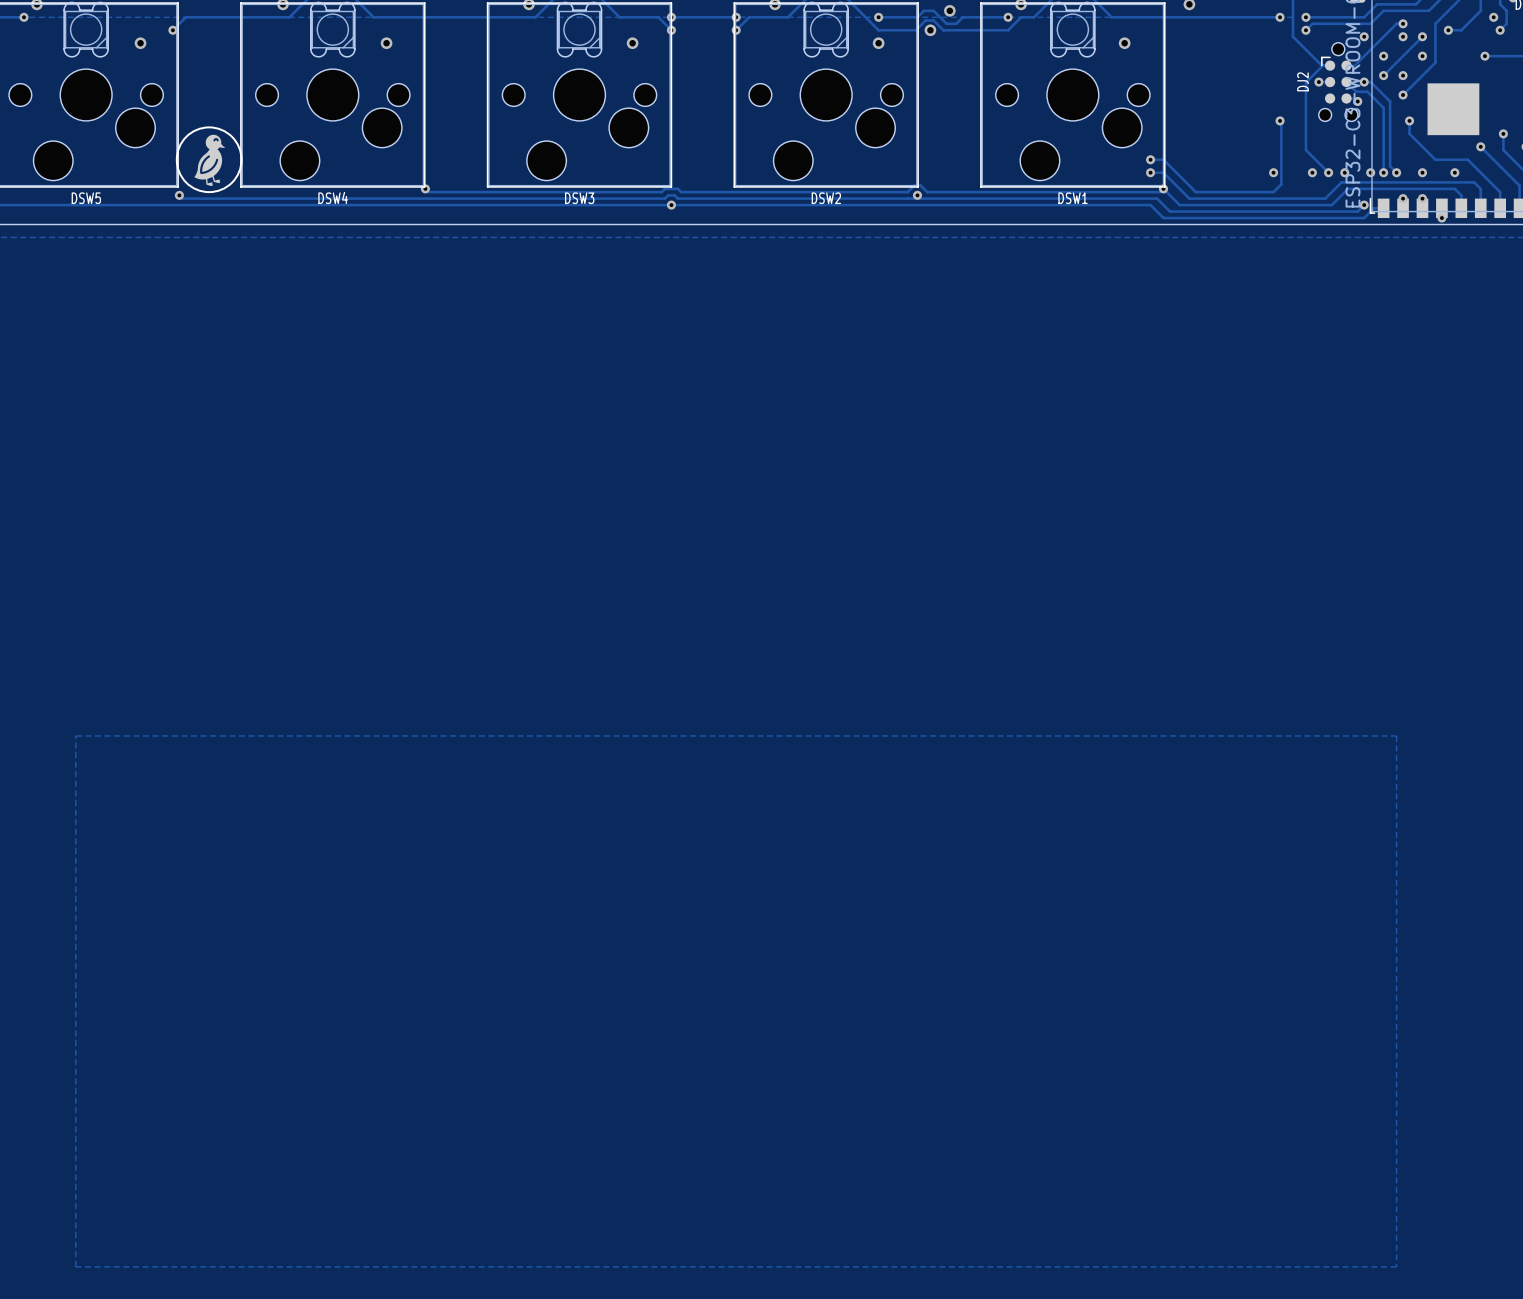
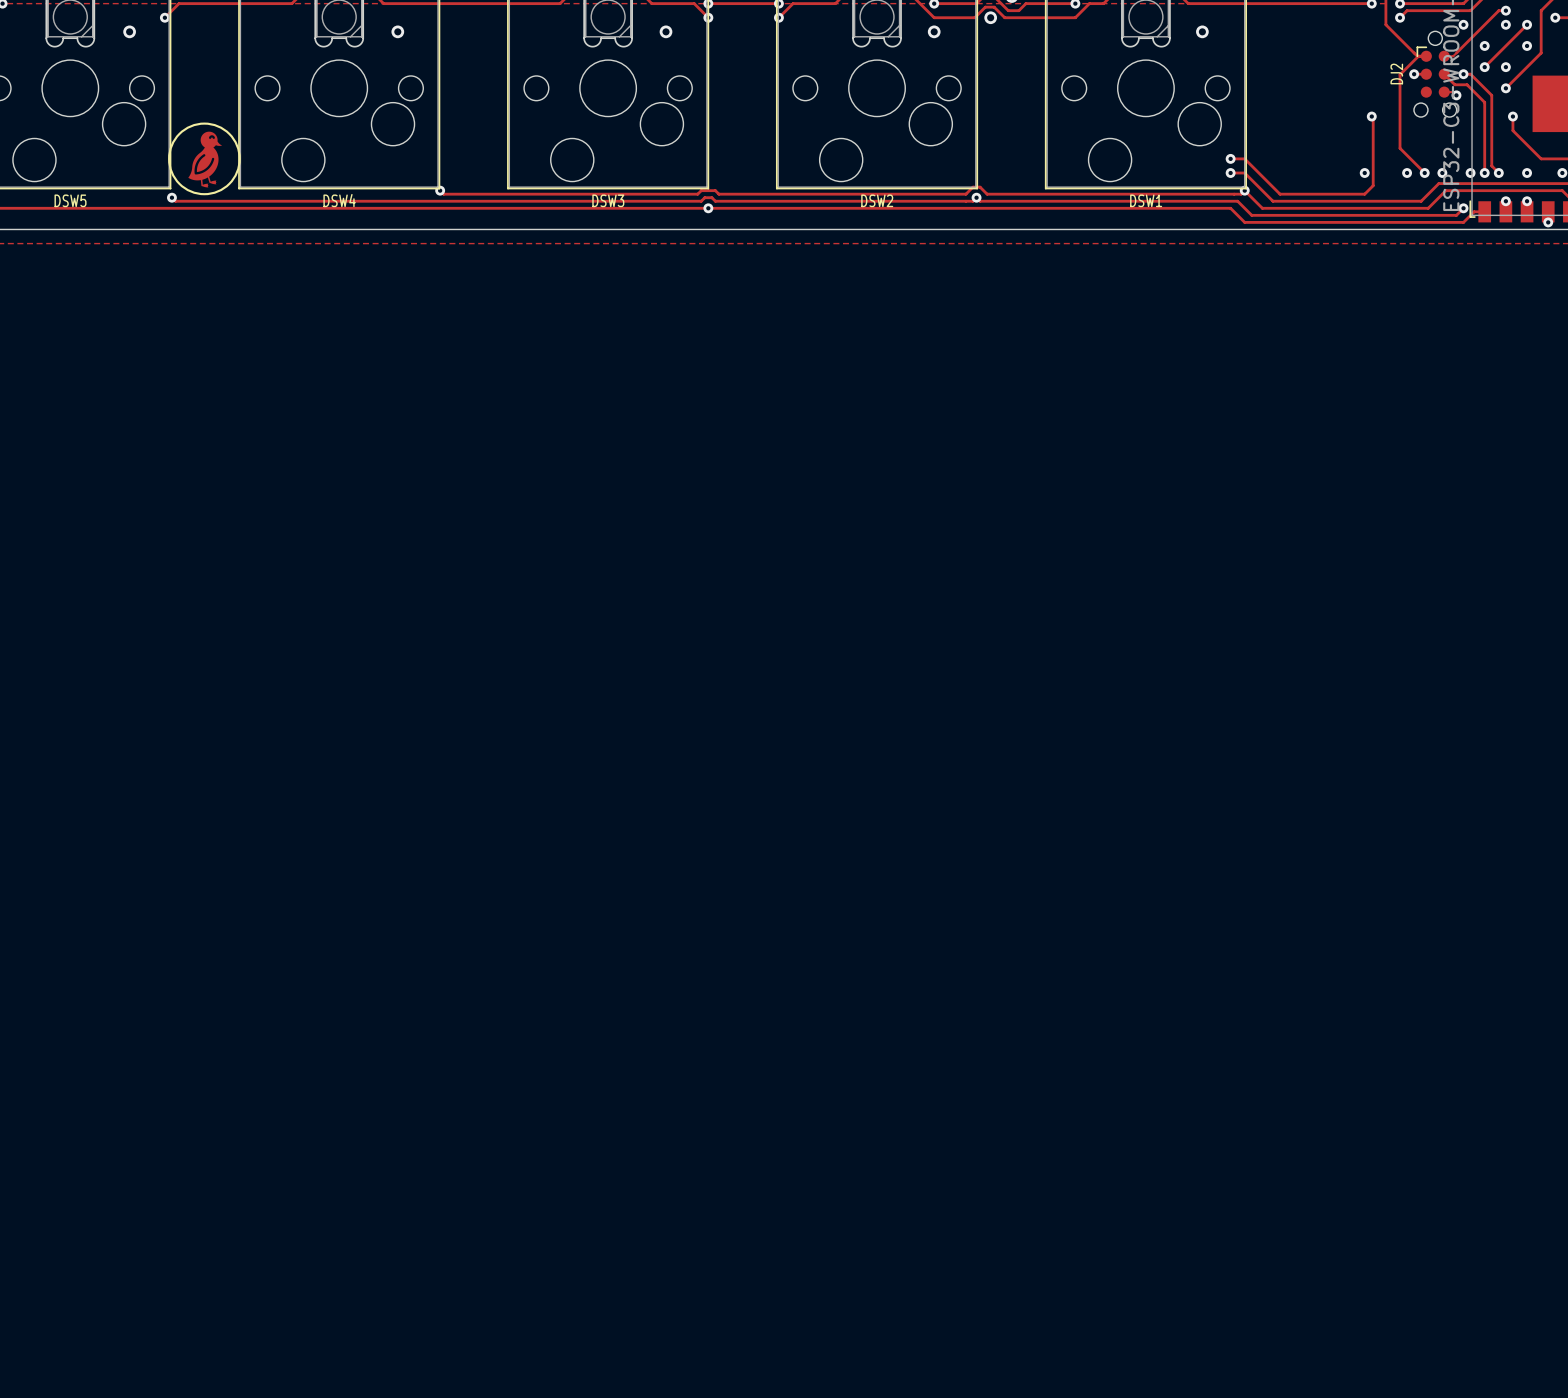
zone outline: (75, 735) (75, 1266) (1396, 1266) (1396, 735) (75, 735) -> none

